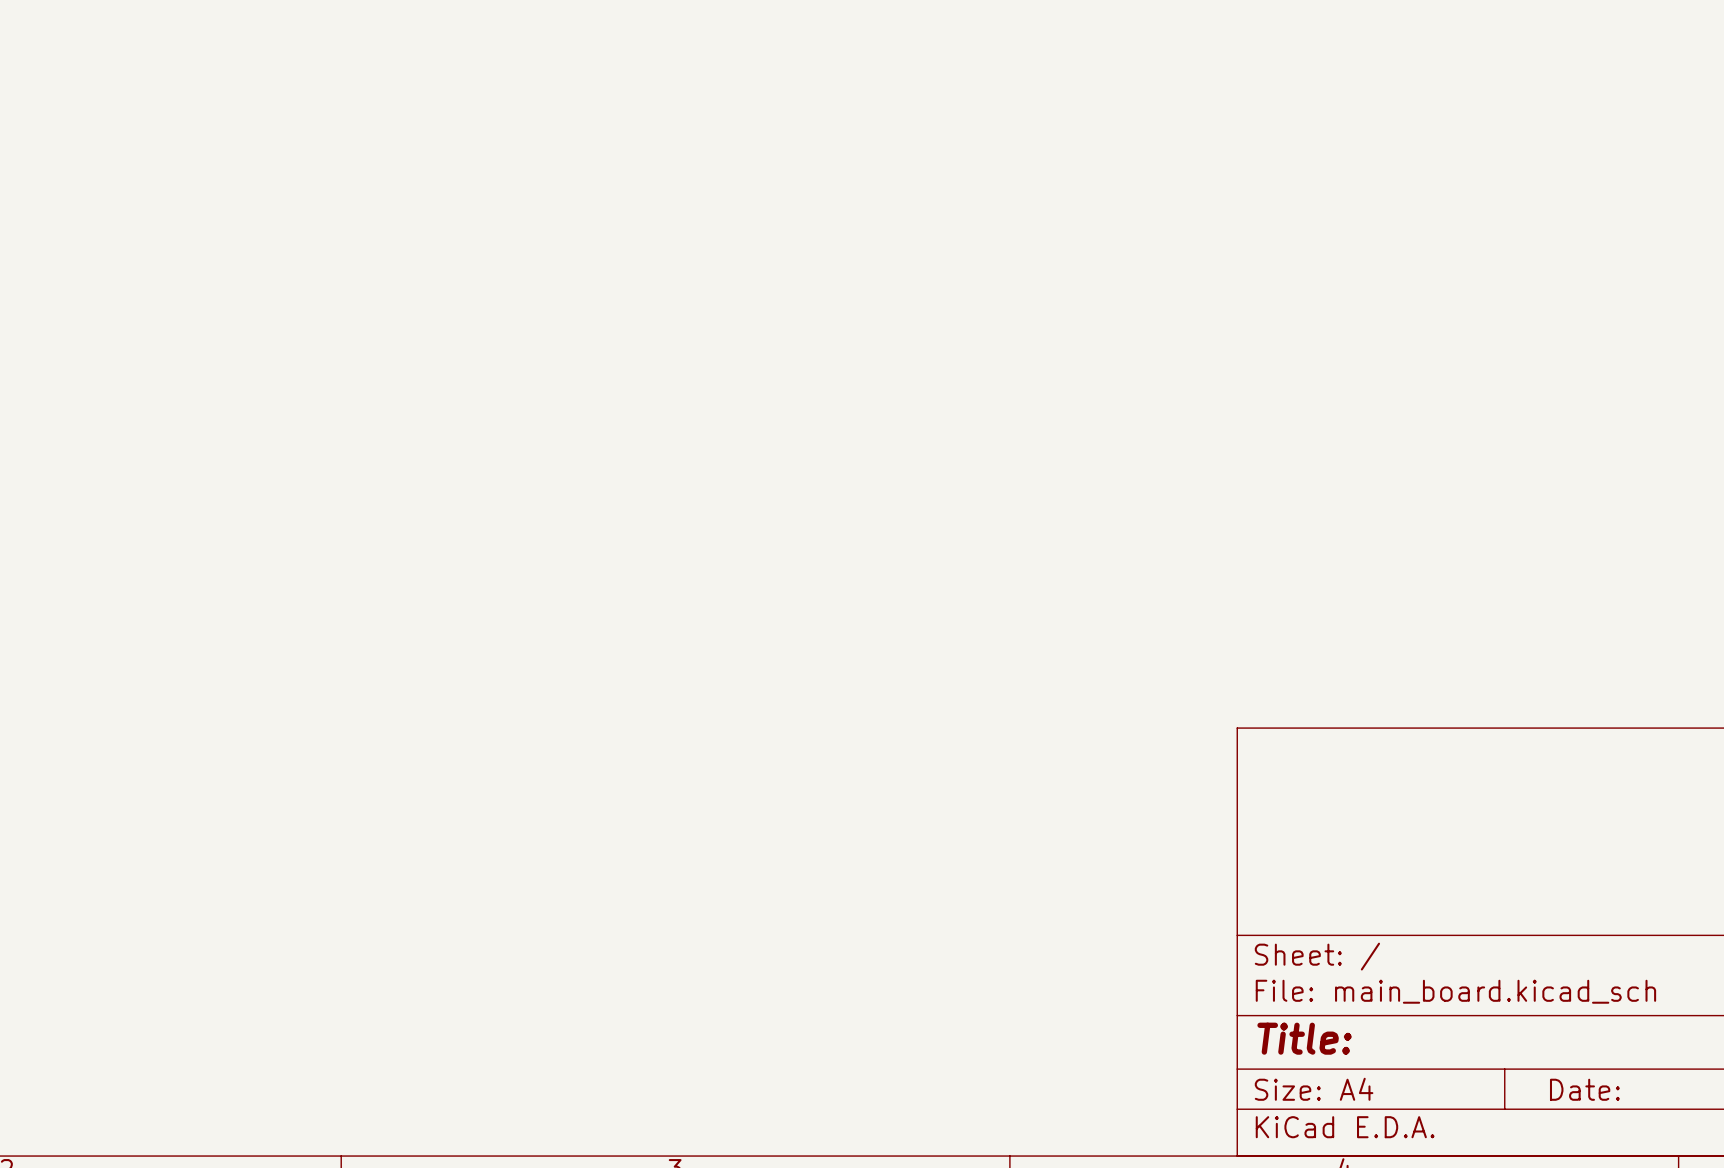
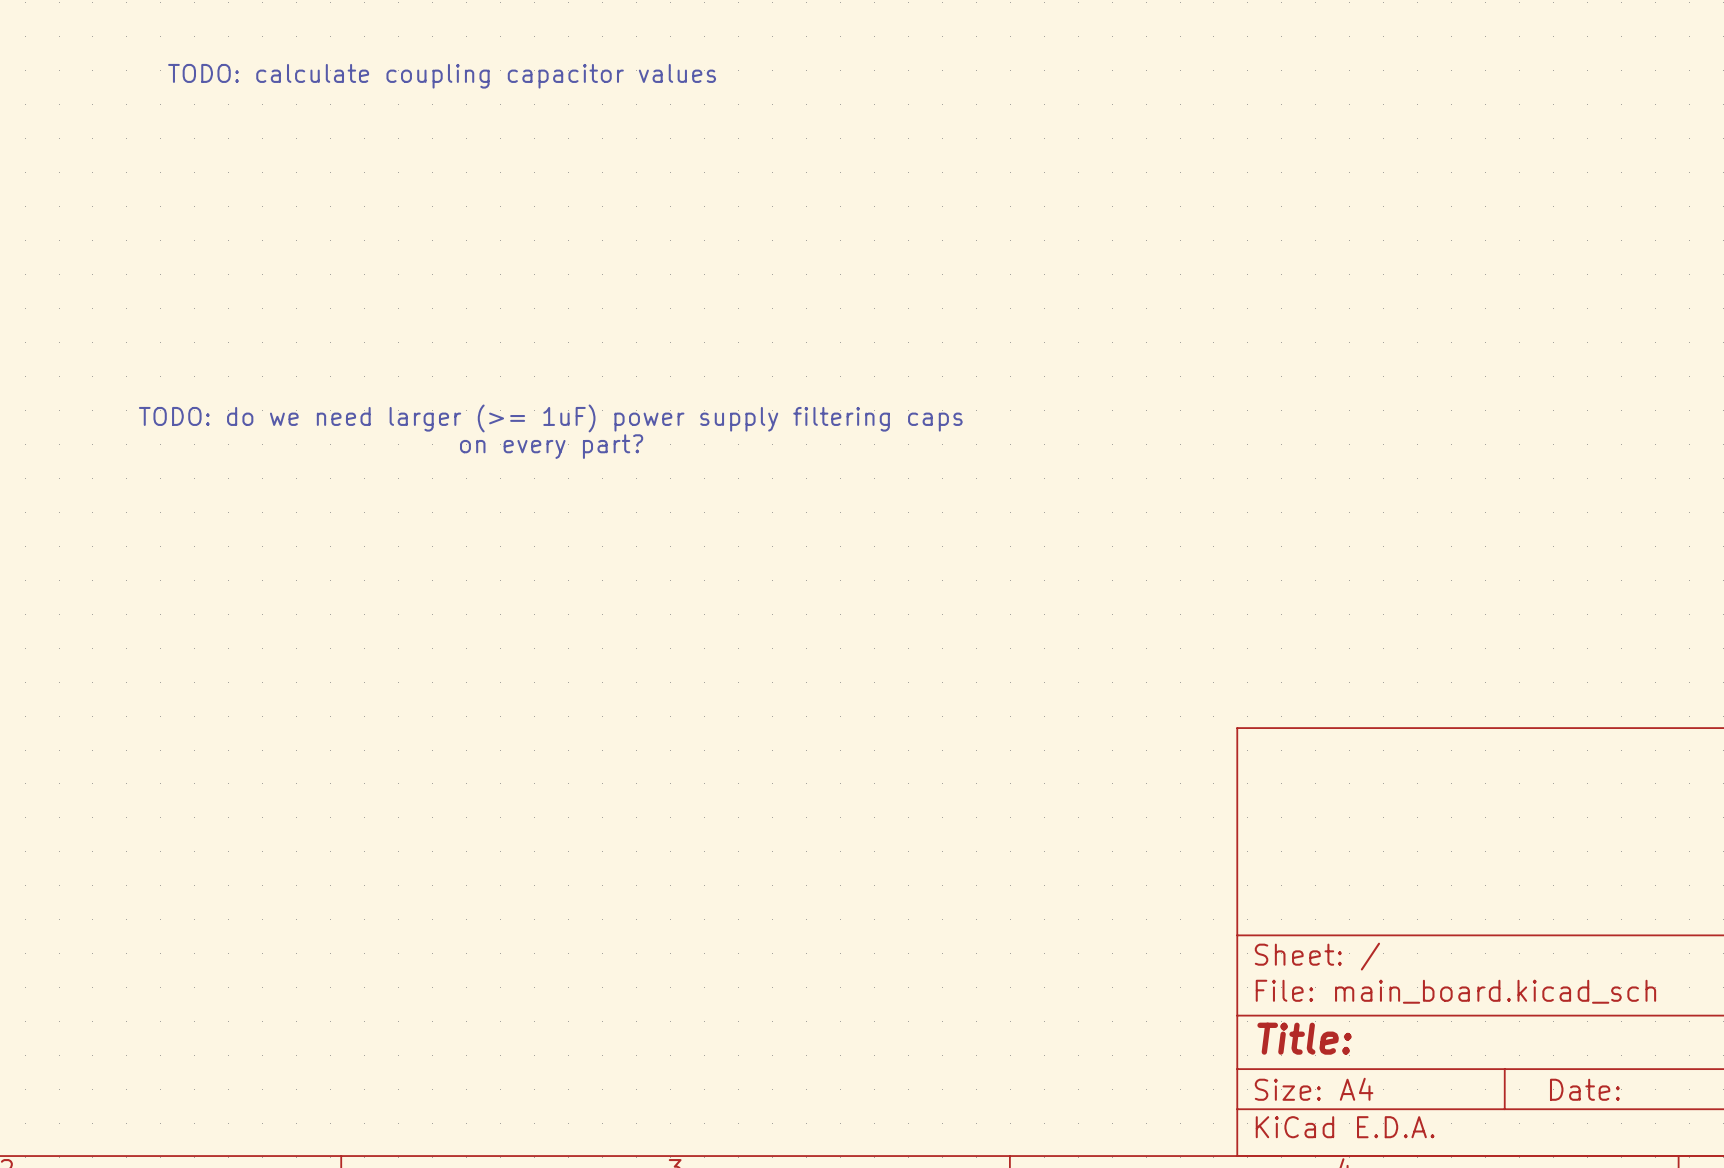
text: none -> TODO: calculate coupling capacitor values (442, 76)
text: none -> TODO: do we need larger (>= 1uF) power supply filtering caps (550, 418)
text: none -> on every part? (551, 446)

